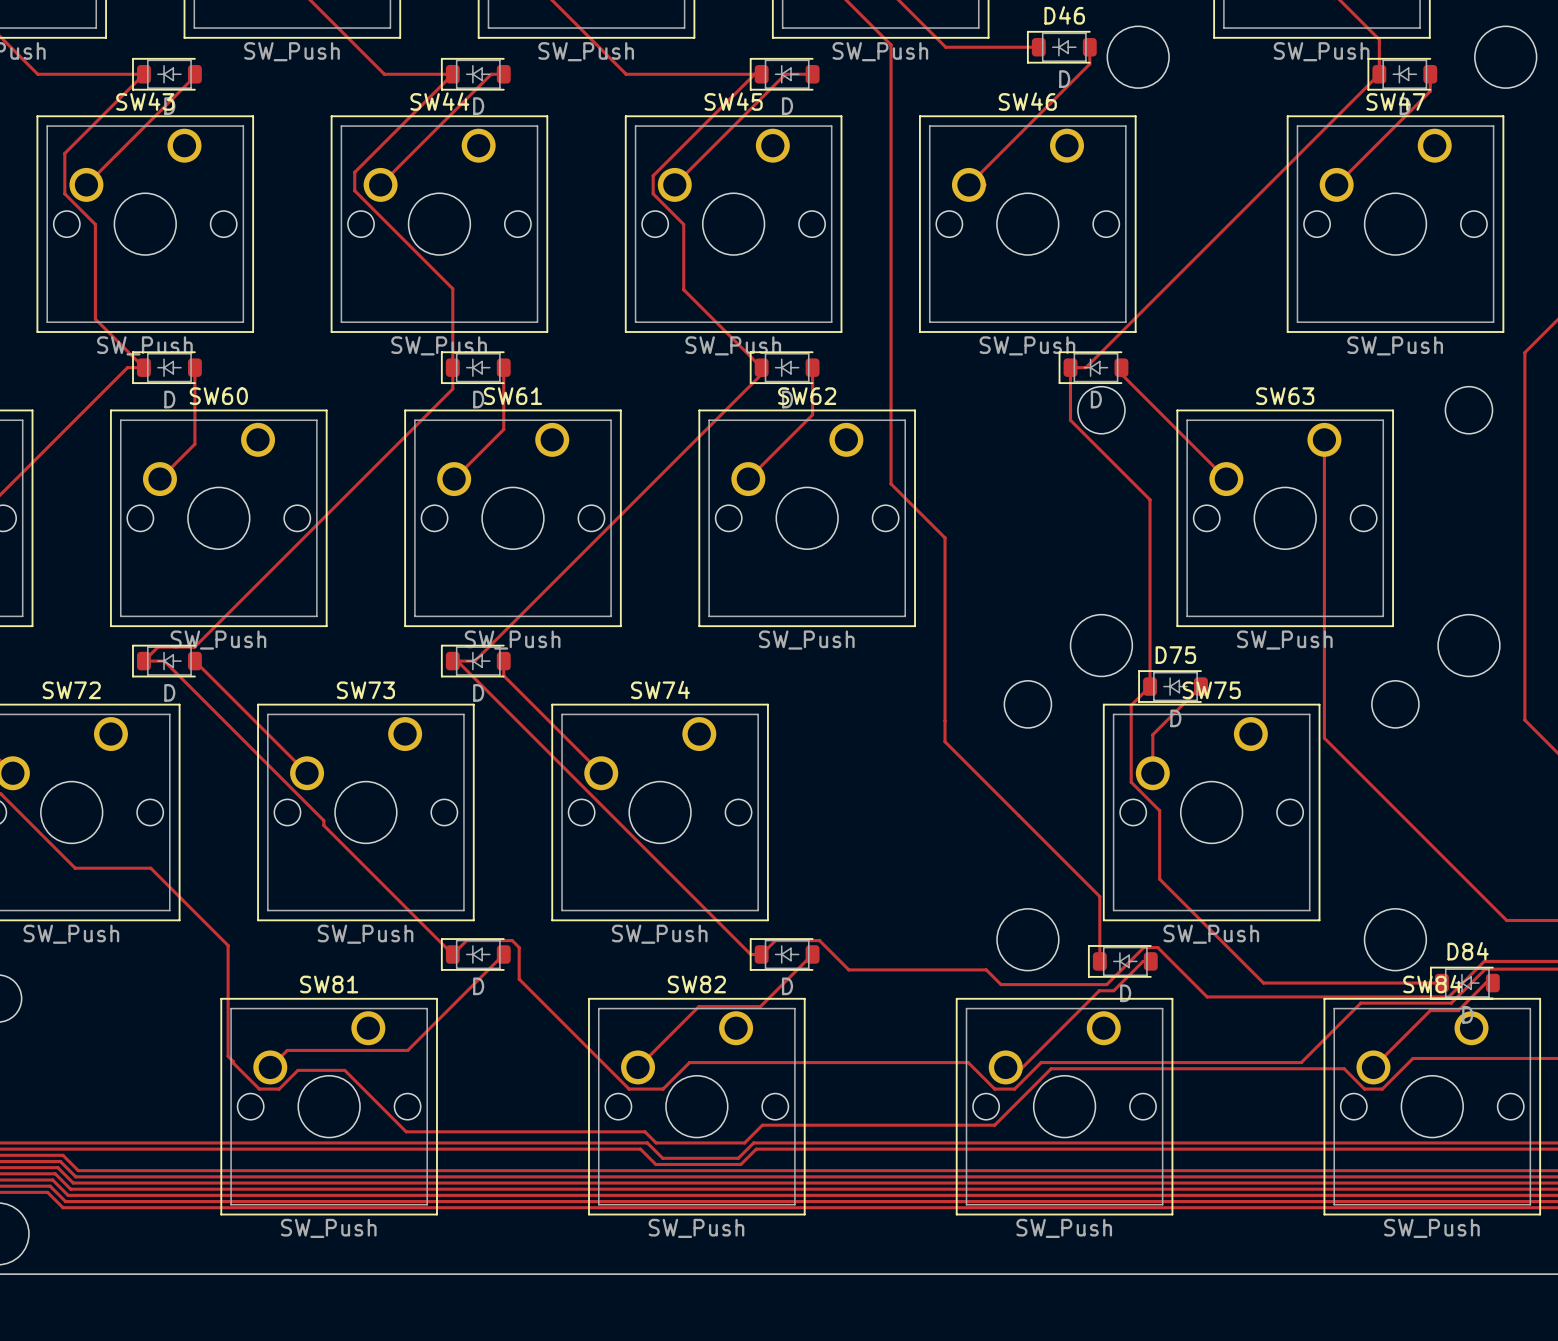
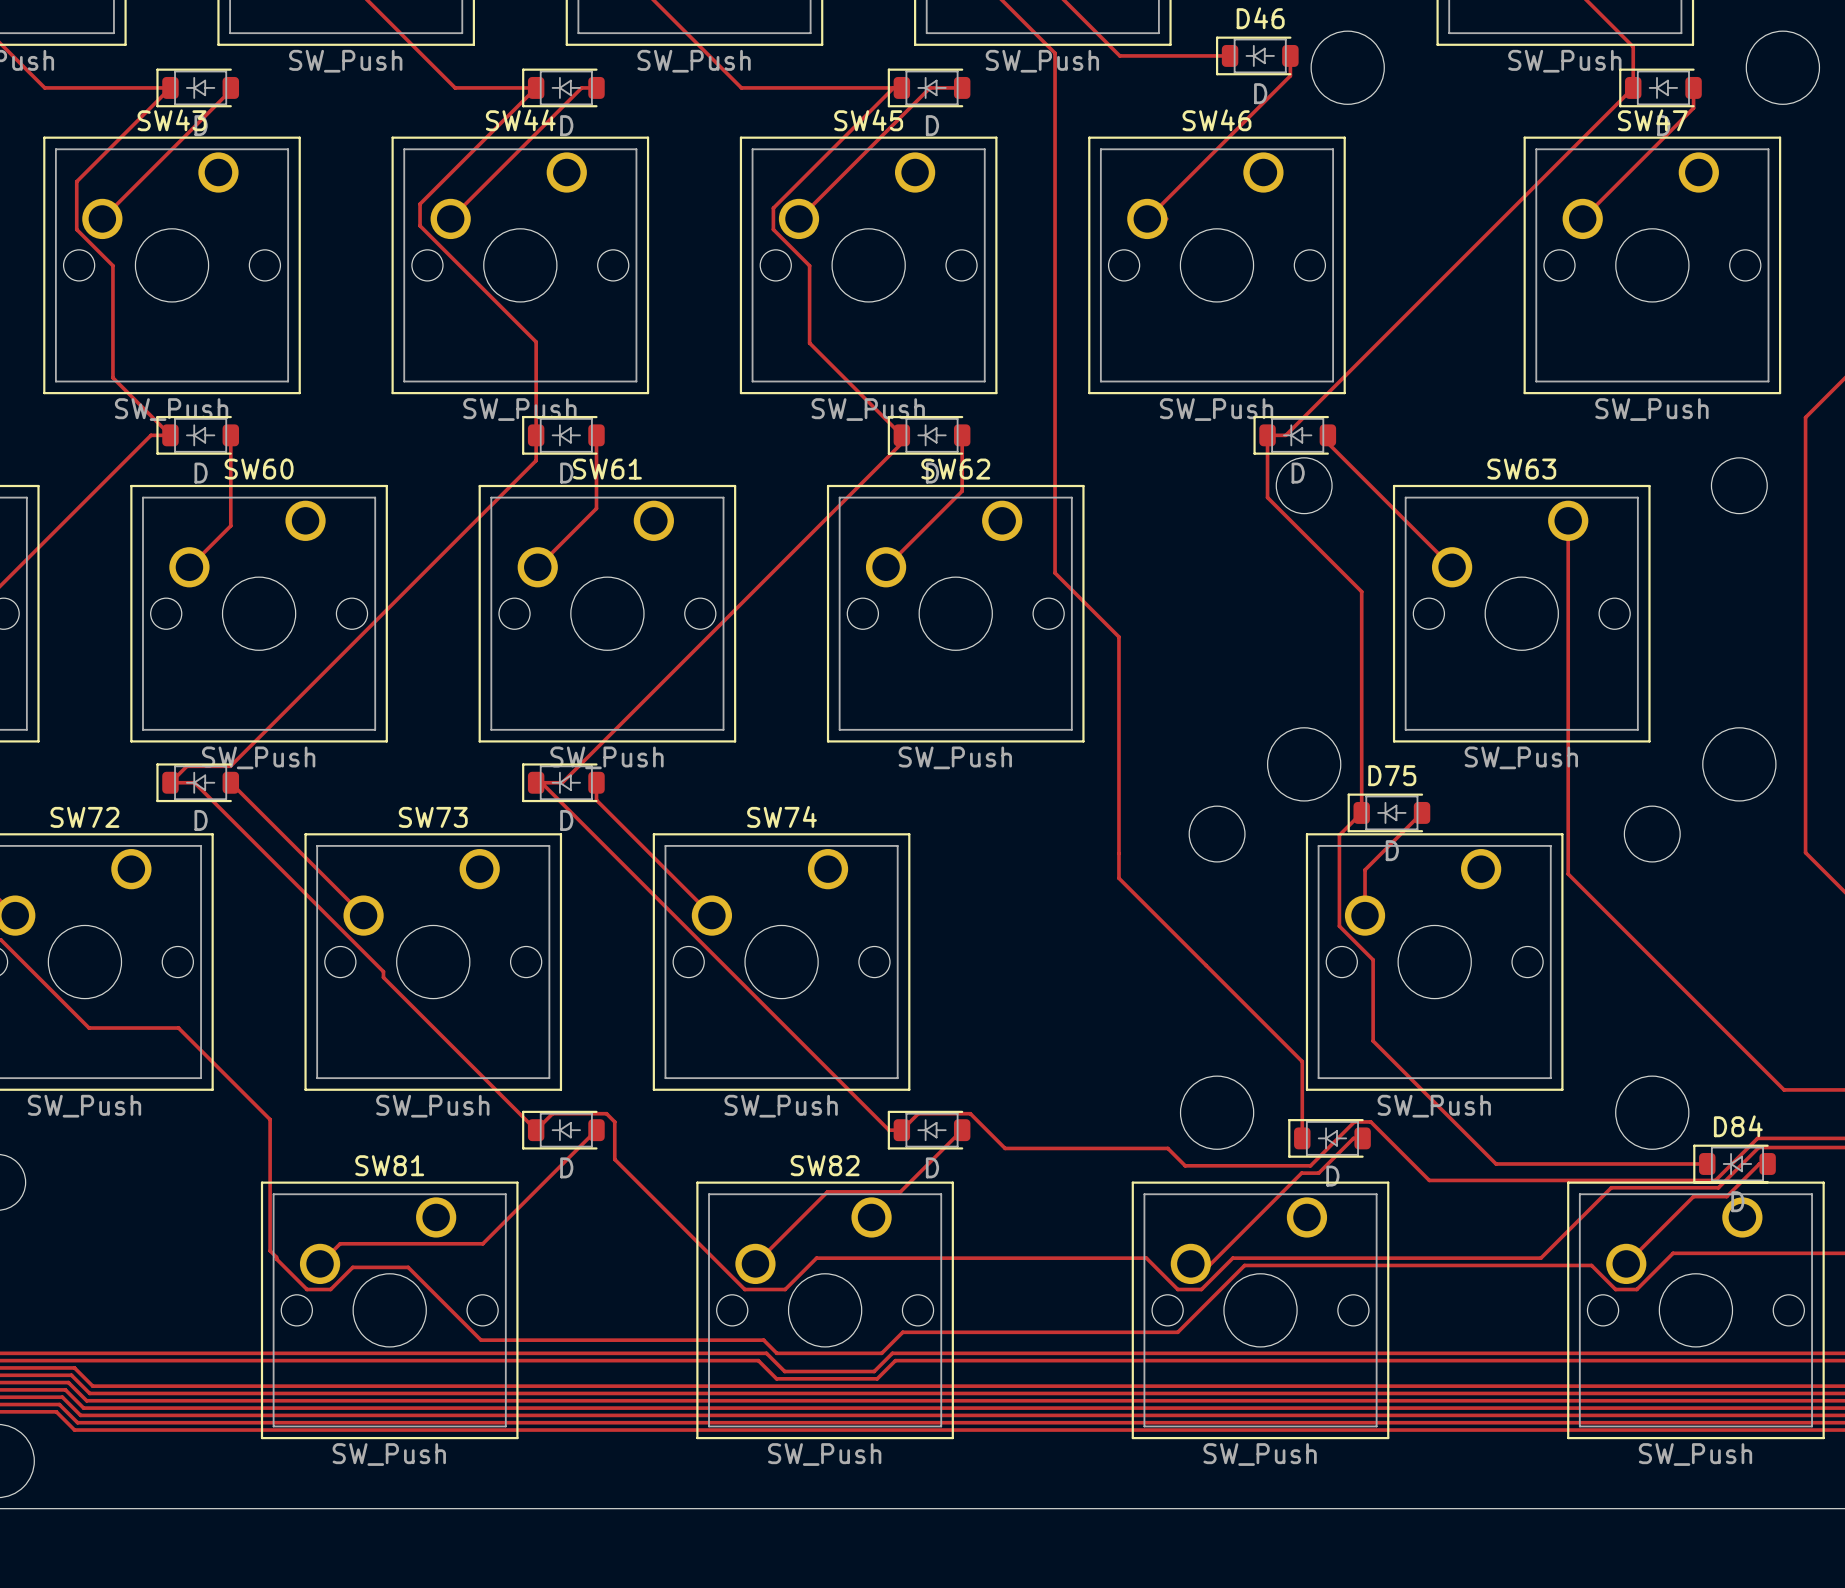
SW75 name: SW75 (1211, 690) -> none
SW84 name: SW84 (1432, 984) -> none

